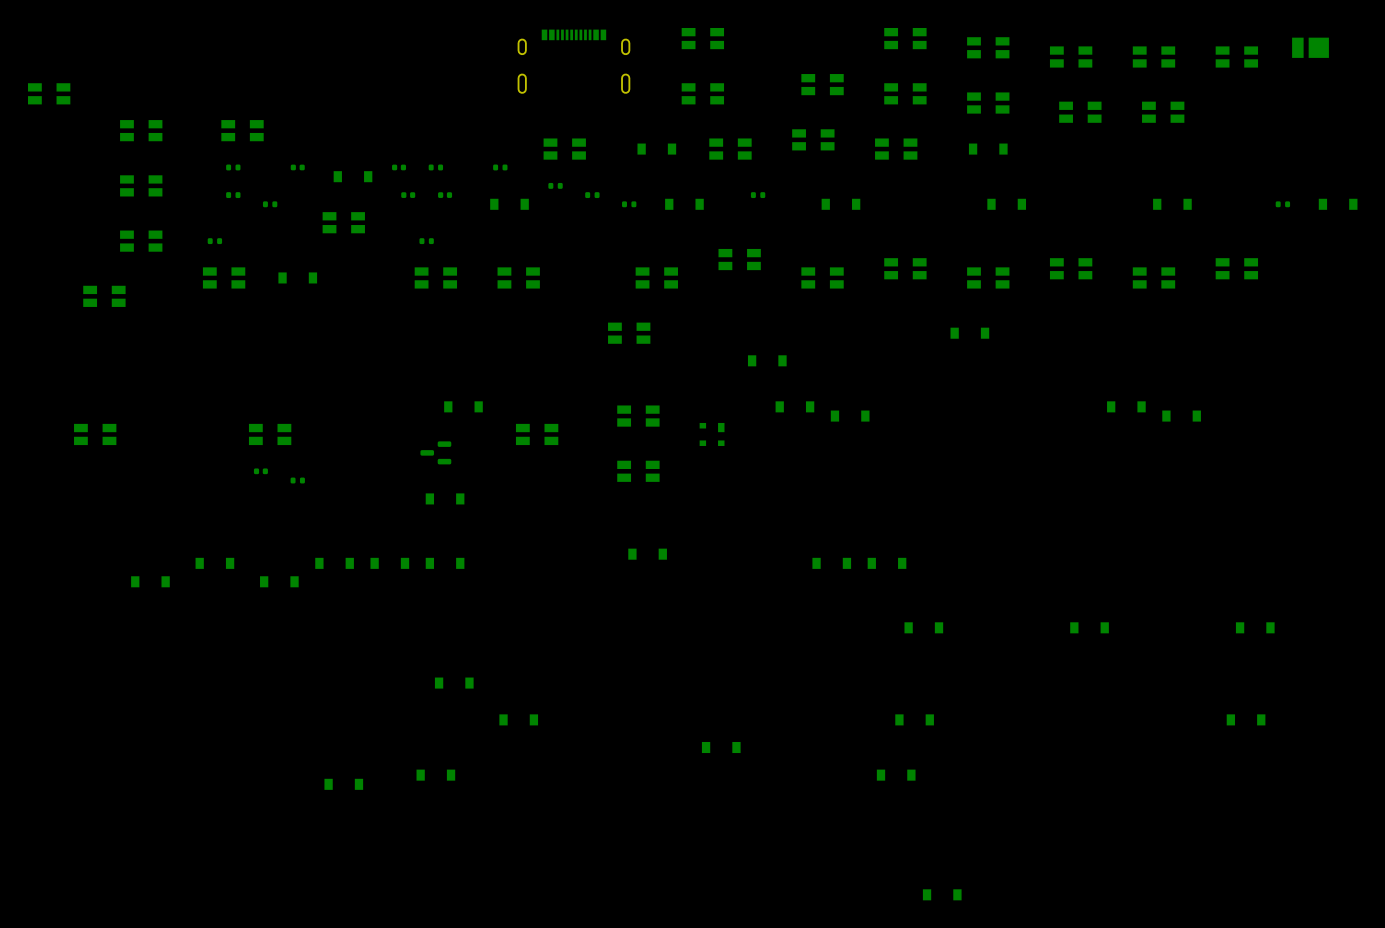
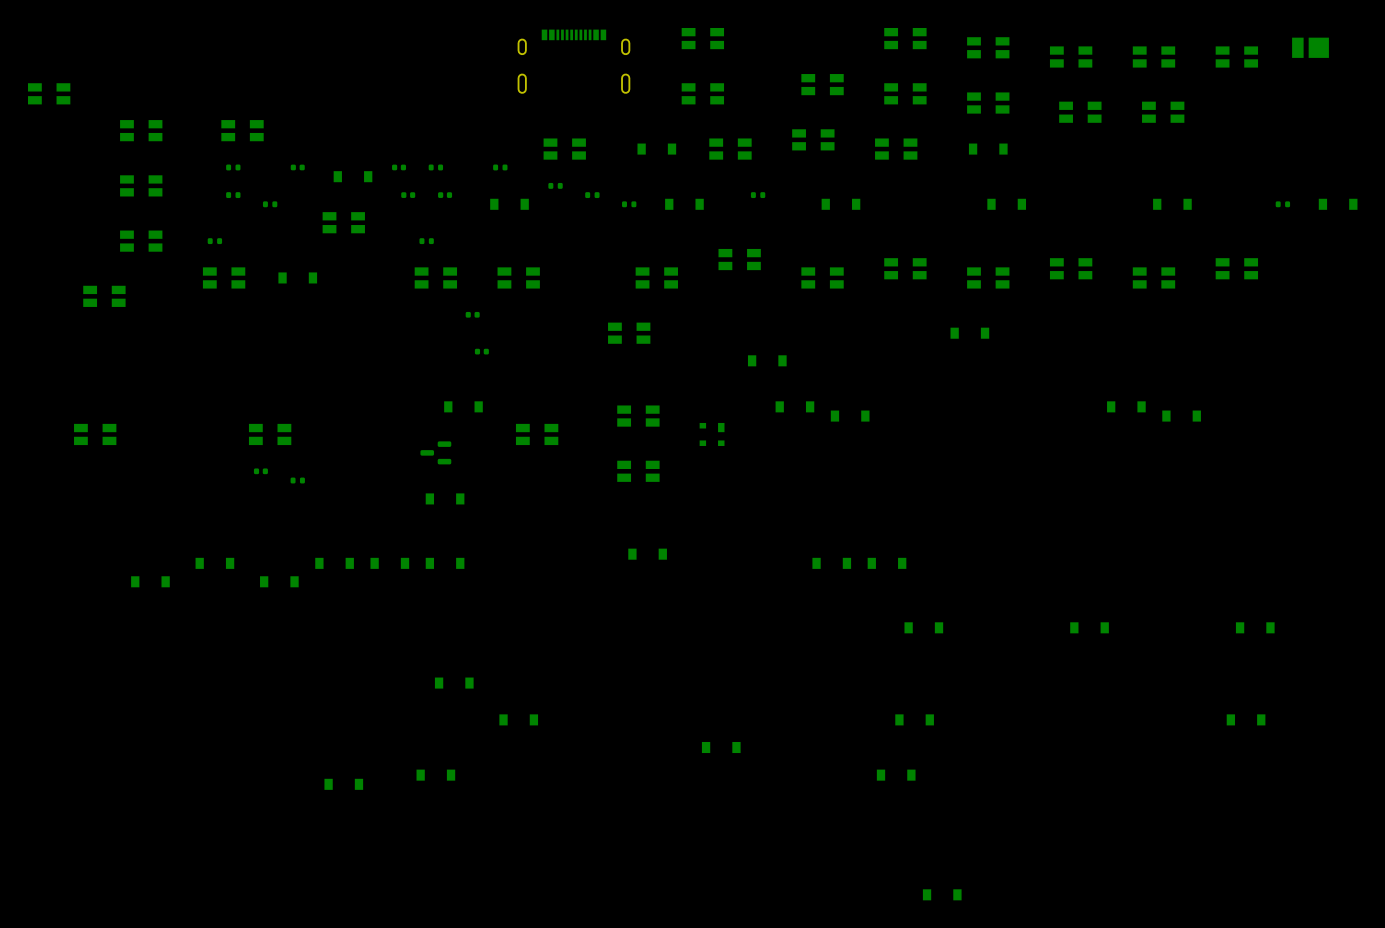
part: none -> (472, 314)
part: none -> (481, 351)

